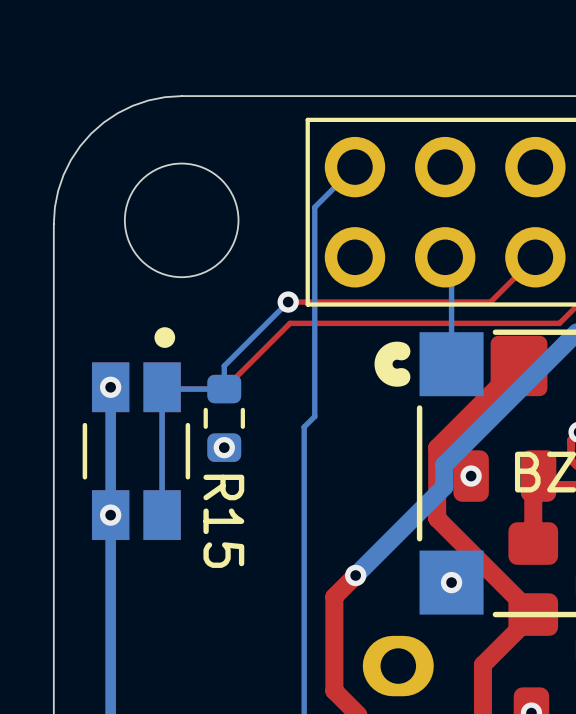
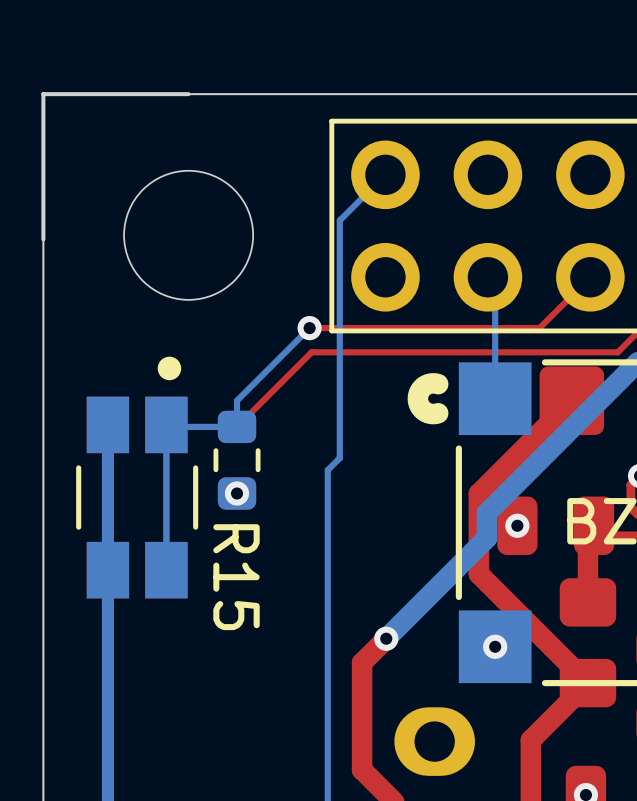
board edge: (181, 96) (148, 100) (132, 105) (117, 113) (91, 133) (70, 160) (63, 174) (58, 190) (53, 223) -> (188, 94) (43, 94) (43, 239)
via: (110, 387) -> none
via: (110, 515) -> none

